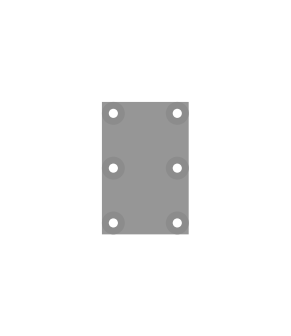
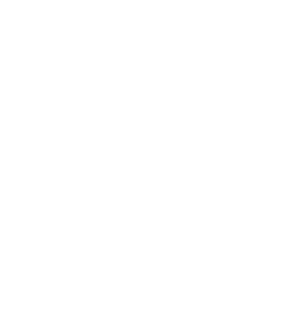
part: (145, 168) -> none

